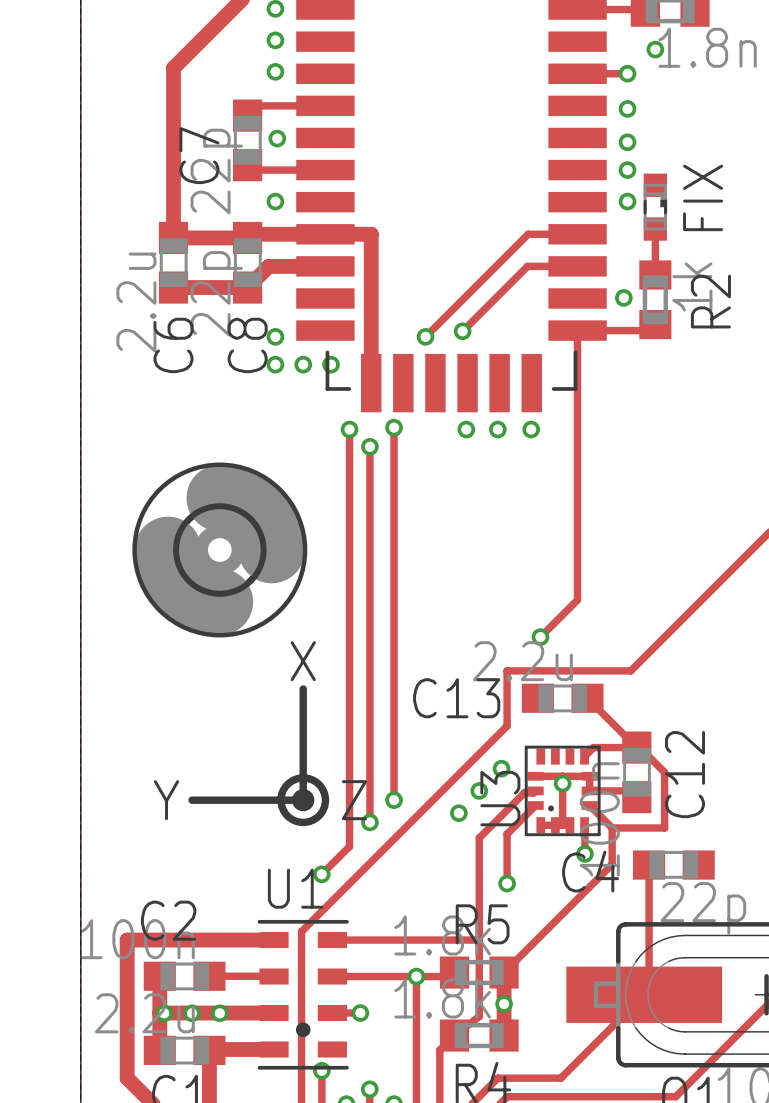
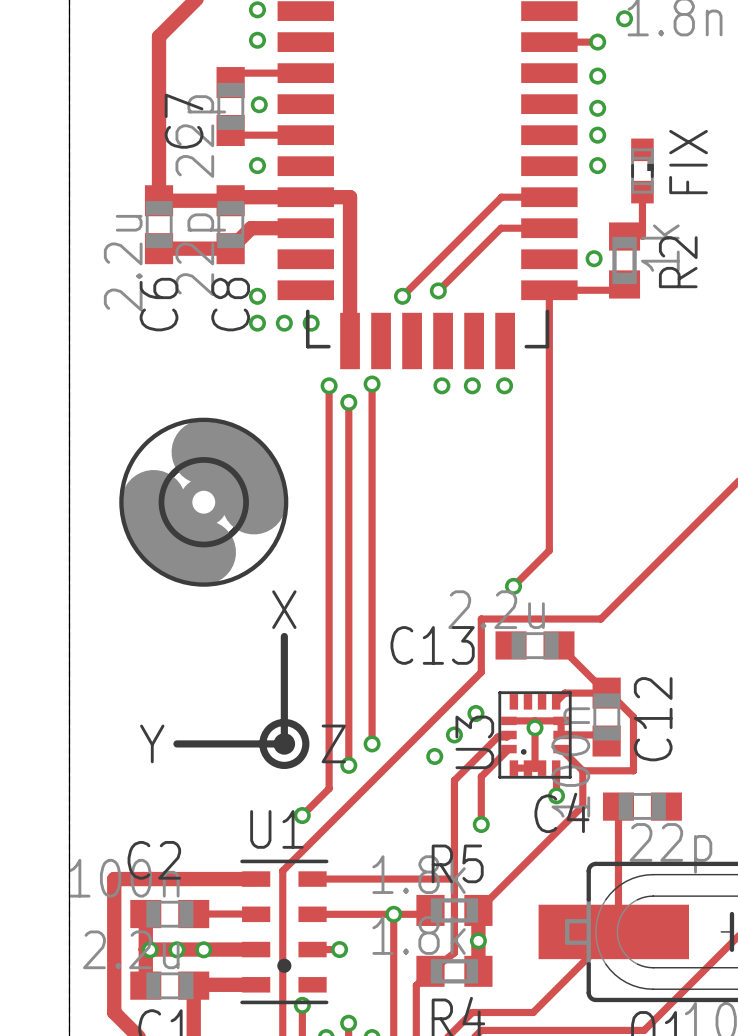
FIX position: (655, 207) -> (642, 170)
track: (655, 229) (655, 274) -> (642, 192) (642, 236)

